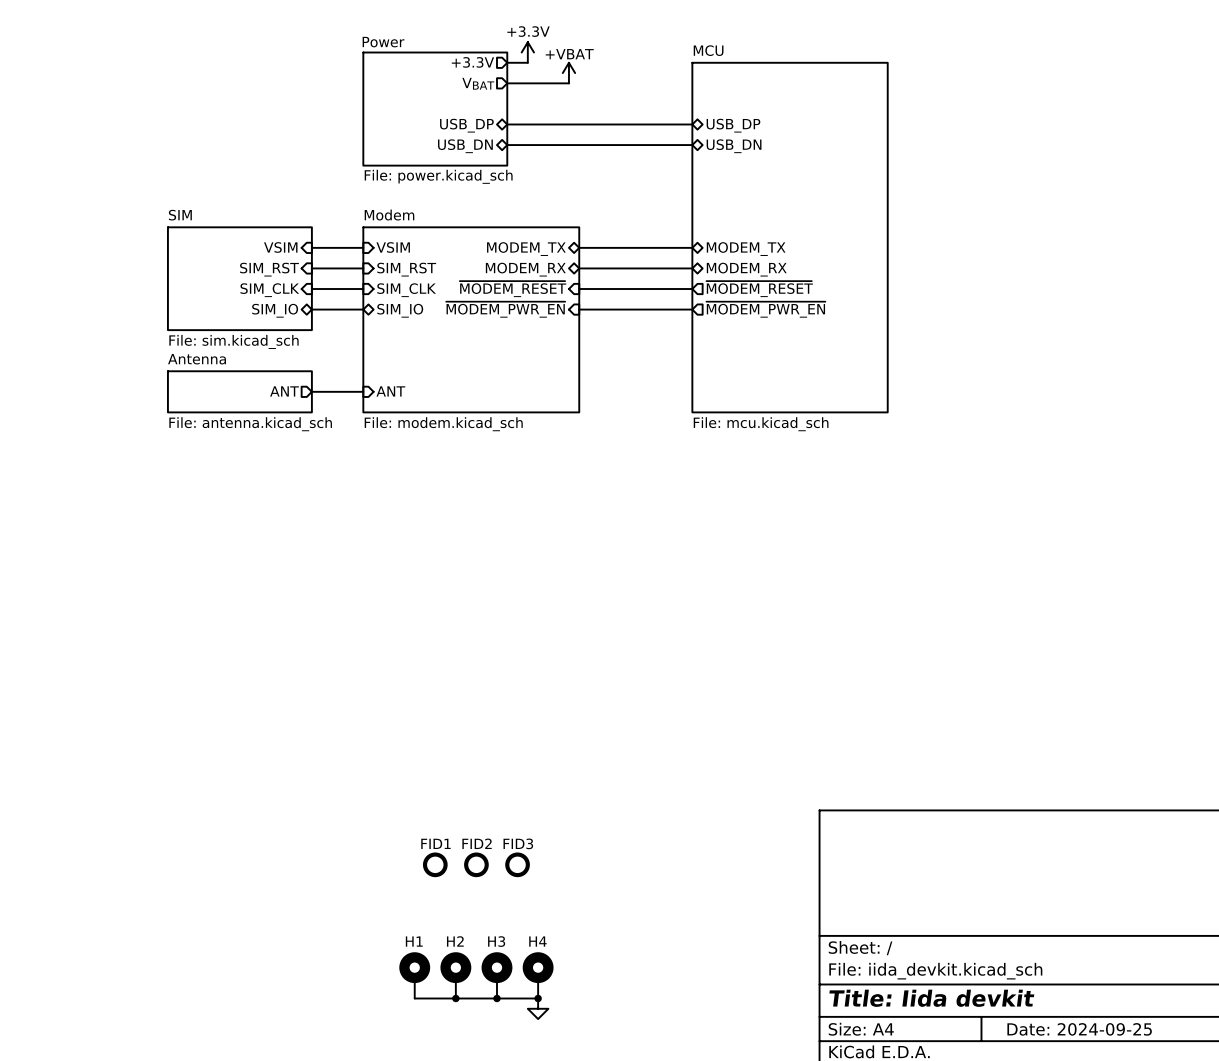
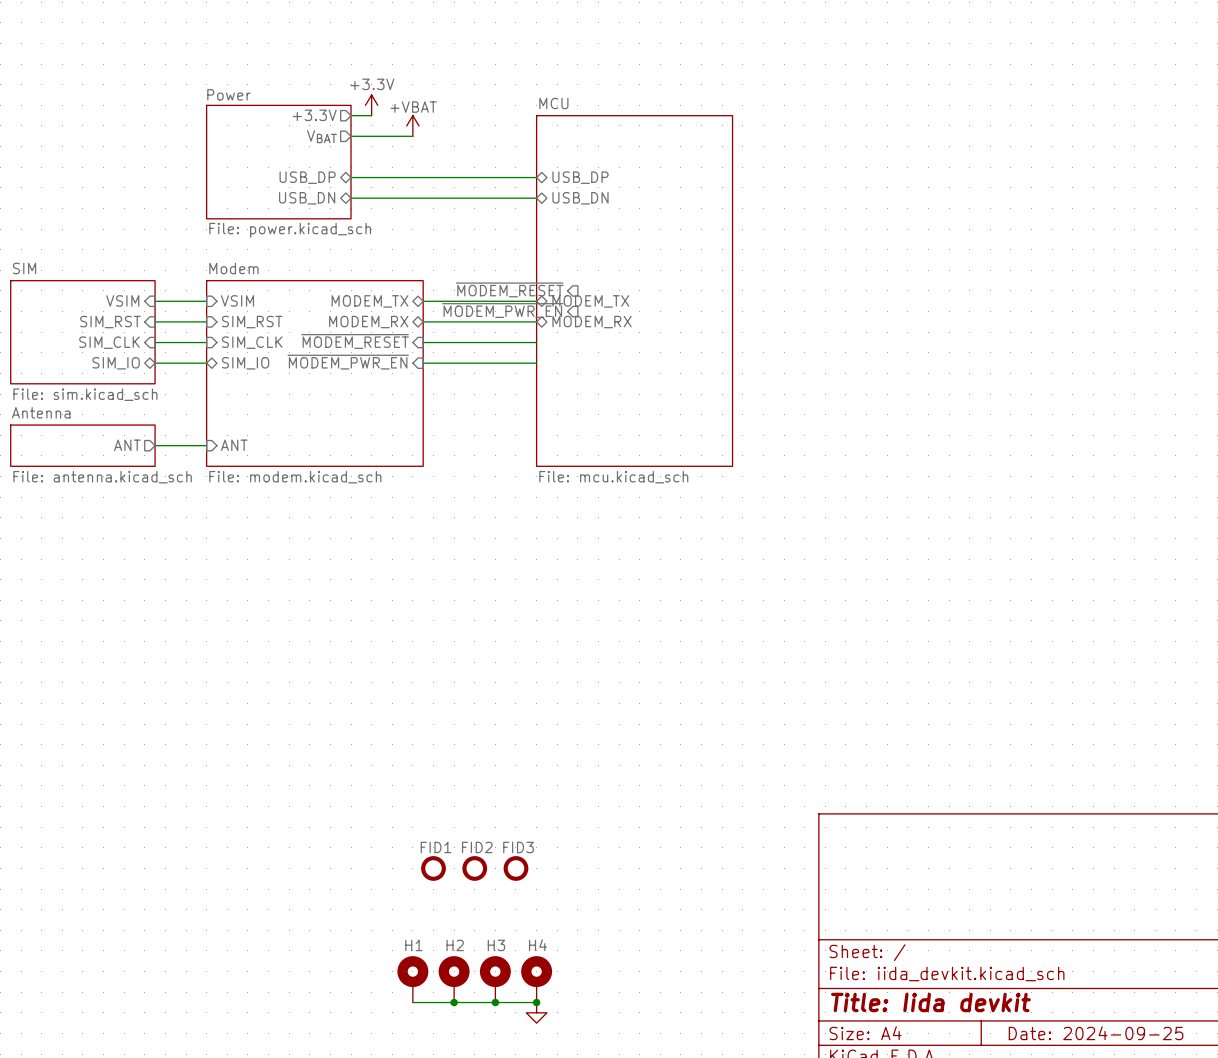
power symbol position: +3.3V (527, 52) -> +3.3V (371, 105)
sheet pin position: +3.3V (472, 62) -> +3.3V (314, 115)
wire: (507, 62) (527, 62) -> (351, 115) (371, 115)
power symbol position: +VBAT (568, 73) -> +VBAT (412, 125)
sheet pin position: VBAT (478, 83) -> VBAT (321, 136)
wire: (507, 83) (568, 83) -> (351, 136) (412, 136)
sheet Power position: (435, 109) -> (278, 162)
wire: (507, 124) (692, 124) -> (351, 177) (536, 177)
sheet pin rotation: 0° (466, 125) -> 180° (580, 177)
sheet pin position: USB_DP (466, 125) -> USB_DP (580, 177)
sheet pin: USB_DP (733, 125) -> none
wire: (507, 145) (692, 145) -> (351, 198) (536, 198)
sheet pin rotation: 0° (465, 146) -> 180° (580, 198)
sheet pin position: USB_DN (465, 146) -> USB_DN (580, 198)
sheet pin: USB_DN (734, 146) -> none
sheet pin: none -> USB_DP (307, 177)
sheet pin: none -> USB_DN (307, 198)
sheet MCU position: (790, 237) -> (634, 290)
sheet pin: VSIM (280, 247) -> none
wire: (311, 247) (363, 247) -> (155, 301) (206, 301)
sheet pin: VSIM (393, 247) -> none
wire: (579, 247) (692, 247) -> (423, 301) (536, 301)
sheet pin rotation: 0° (526, 249) -> 180° (590, 301)
sheet pin position: MODEM_TX (526, 249) -> MODEM_TX (590, 301)
sheet pin: MODEM_TX (746, 249) -> none
wire: (311, 268) (363, 268) -> (155, 321) (206, 321)
wire: (579, 268) (692, 268) -> (423, 321) (536, 321)
sheet pin: SIM_RST (269, 269) -> none
sheet pin: SIM_RST (406, 269) -> none
sheet pin rotation: 0° (525, 269) -> 180° (592, 322)
sheet pin: MODEM_RX (746, 269) -> none
sheet SIM position: (239, 278) -> (82, 332)
wire: (311, 289) (363, 289) -> (155, 342) (206, 342)
wire: (579, 289) (692, 289) -> (423, 342) (536, 342)
sheet pin: ~{MODEM_RESET} (759, 289) -> none
sheet pin: SIM_CLK (269, 290) -> none
sheet pin: SIM_CLK (406, 290) -> none
sheet pin: none -> VSIM (122, 300)
sheet pin: none -> VSIM (237, 300)
sheet pin: none -> MODEM_TX (369, 301)
wire: (311, 309) (363, 309) -> (155, 363) (206, 363)
wire: (579, 309) (692, 309) -> (423, 363) (536, 363)
sheet pin: ~{MODEM_PWR_EN} (765, 309) -> none
sheet pin shape: bidirectional (275, 310) -> input (252, 322)
sheet pin: SIM_IO (275, 310) -> SIM_RST (252, 322)
sheet pin: SIM_IO (400, 310) -> none
sheet Modem position: (471, 319) -> (314, 373)
sheet pin: none -> SIM_RST (110, 322)
sheet pin: none -> MODEM_RX (368, 322)
sheet pin: none -> ~{MODEM_RESET} (355, 341)
sheet pin: none -> SIM_CLK (109, 342)
sheet pin: none -> SIM_CLK (252, 342)
sheet pin: none -> ~{MODEM_PWR_EN} (348, 362)
sheet pin: none -> SIM_IO (116, 363)
sheet pin: none -> SIM_IO (245, 363)
sheet Antenna position: (239, 391) -> (82, 445)
sheet pin: ANT (284, 391) -> none
wire: (311, 391) (363, 391) -> (155, 445) (206, 445)
sheet pin: ANT (390, 391) -> none
sheet pin: none -> ANT (127, 445)
sheet pin: none -> ANT (234, 445)

